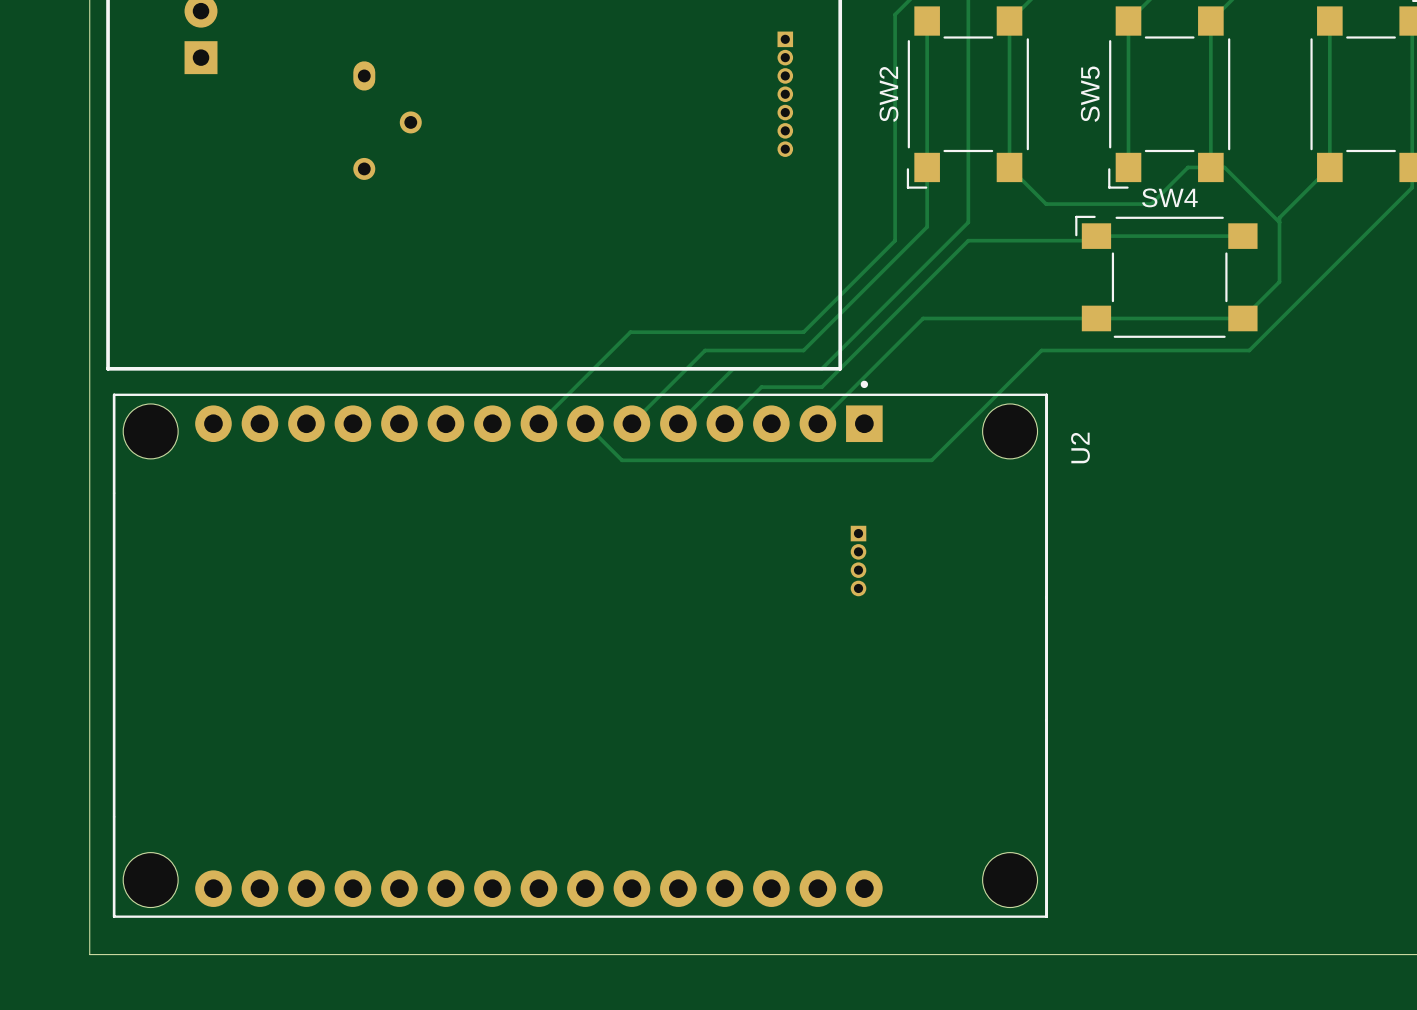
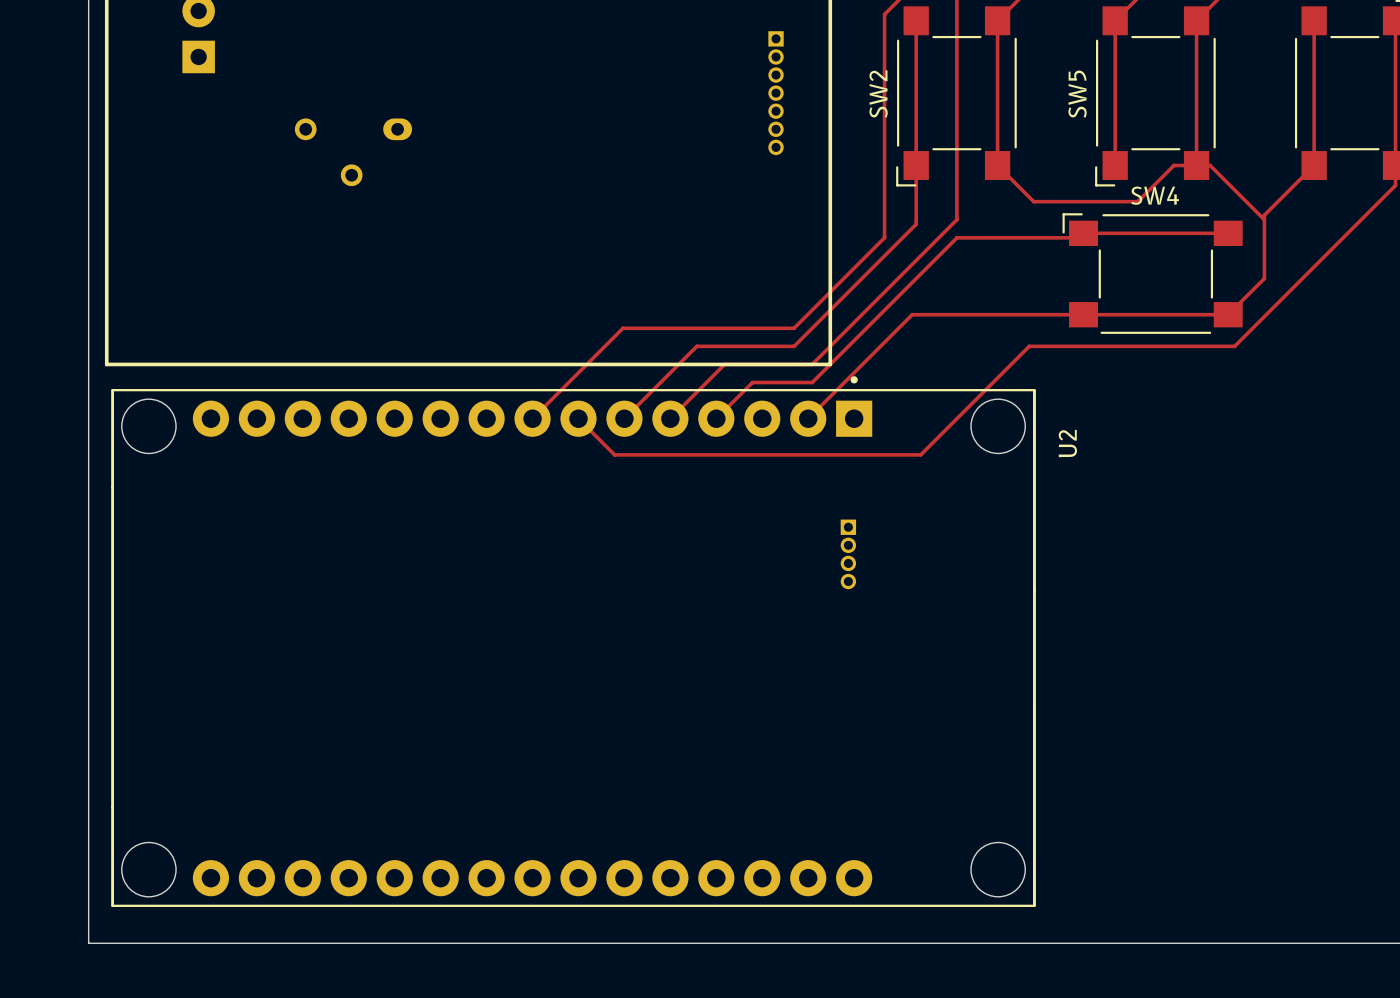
part rotation: 0° (387, 120) -> 90° clockwise (353, 152)

